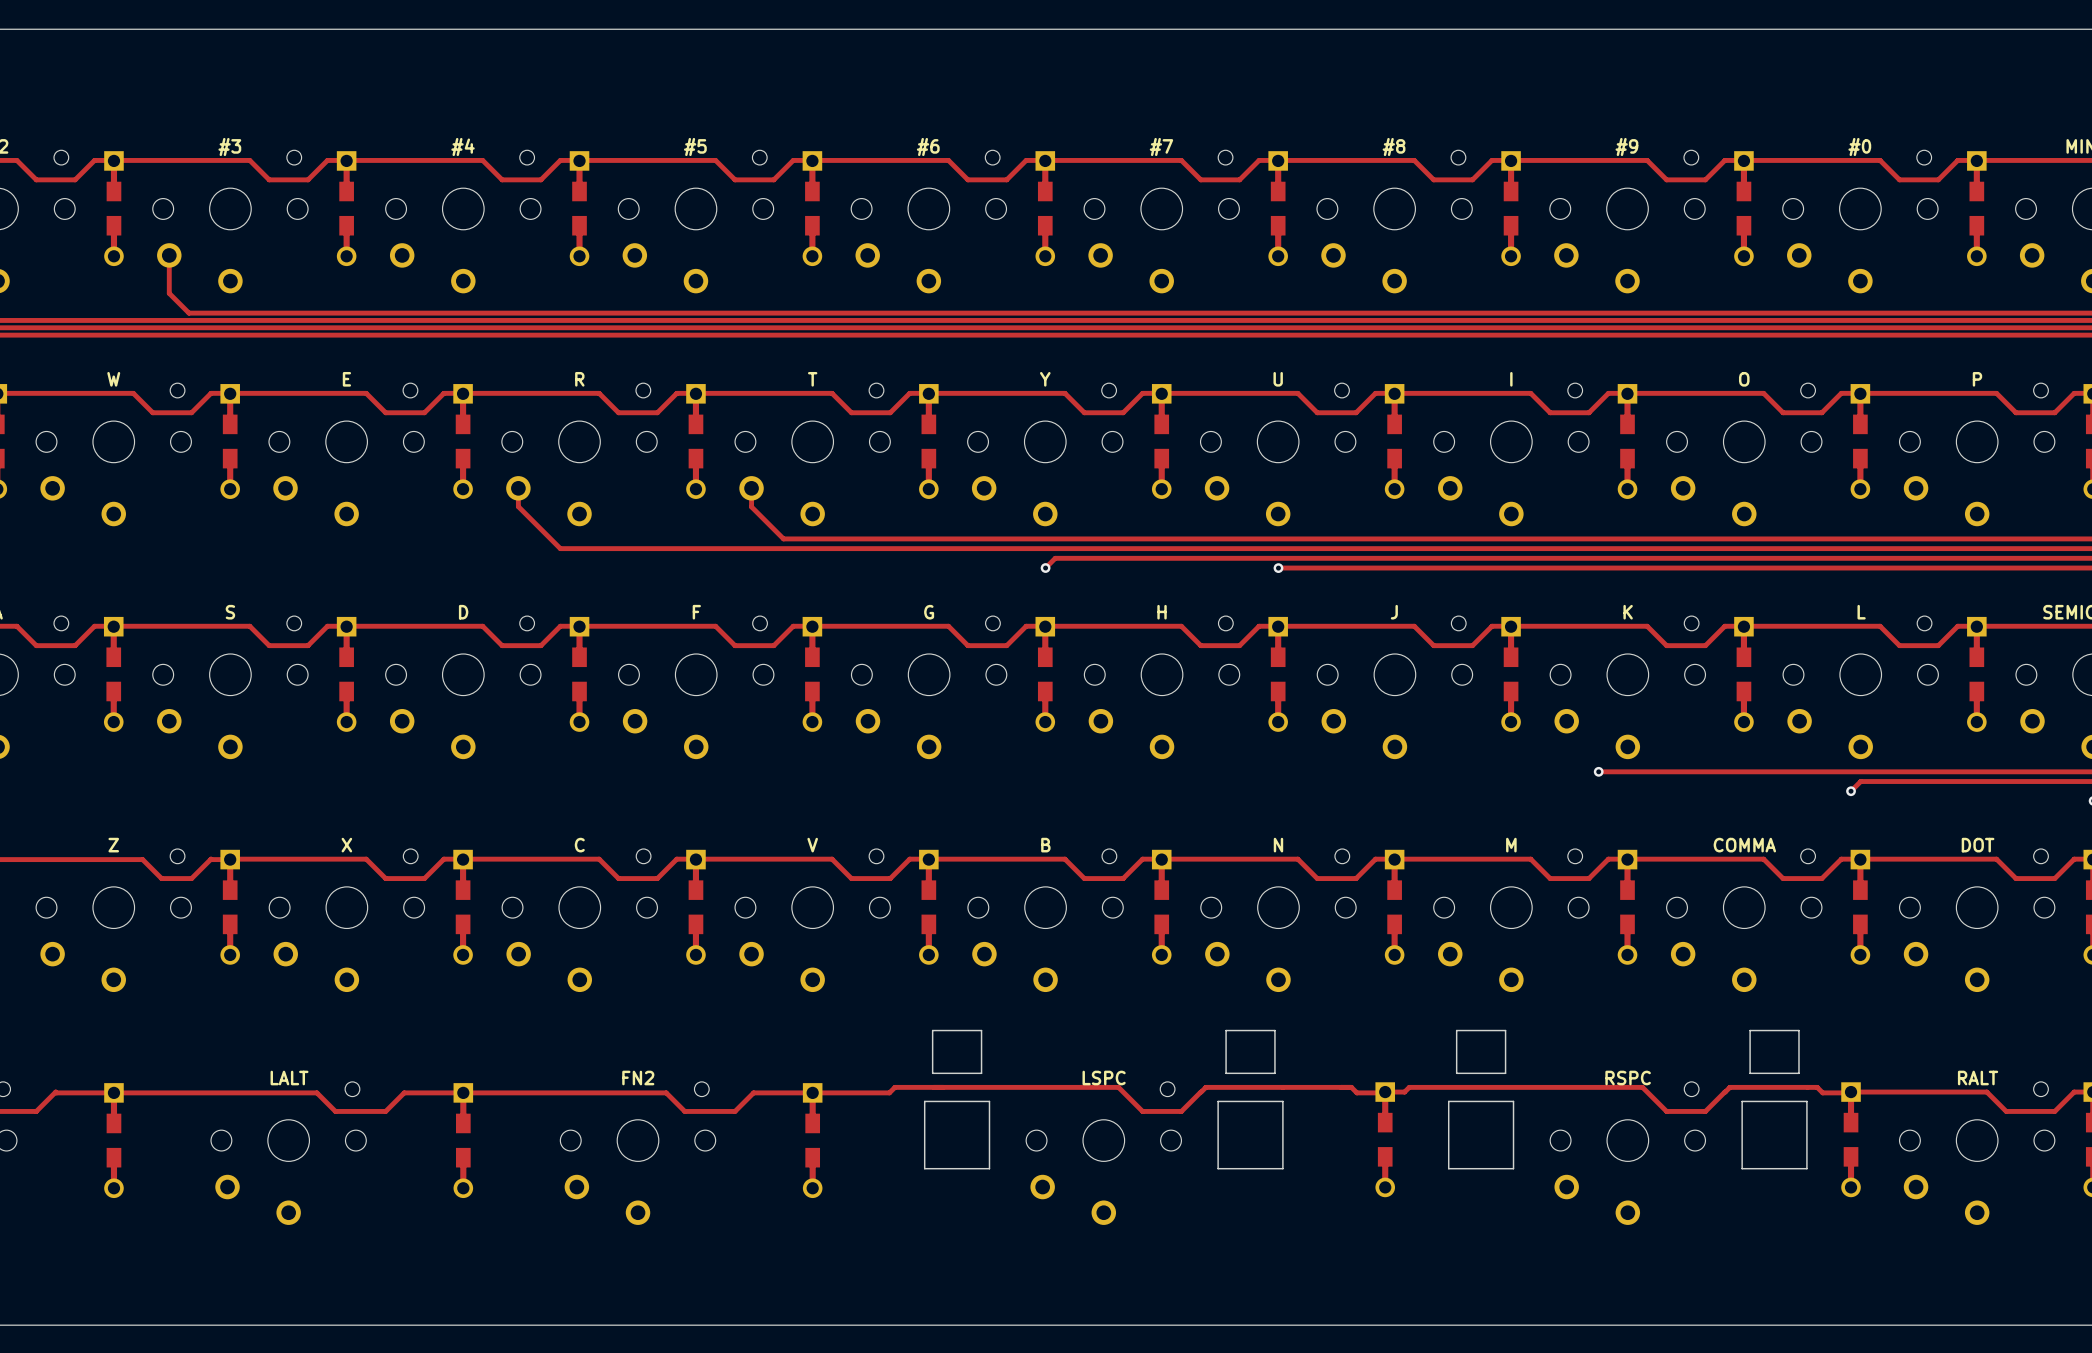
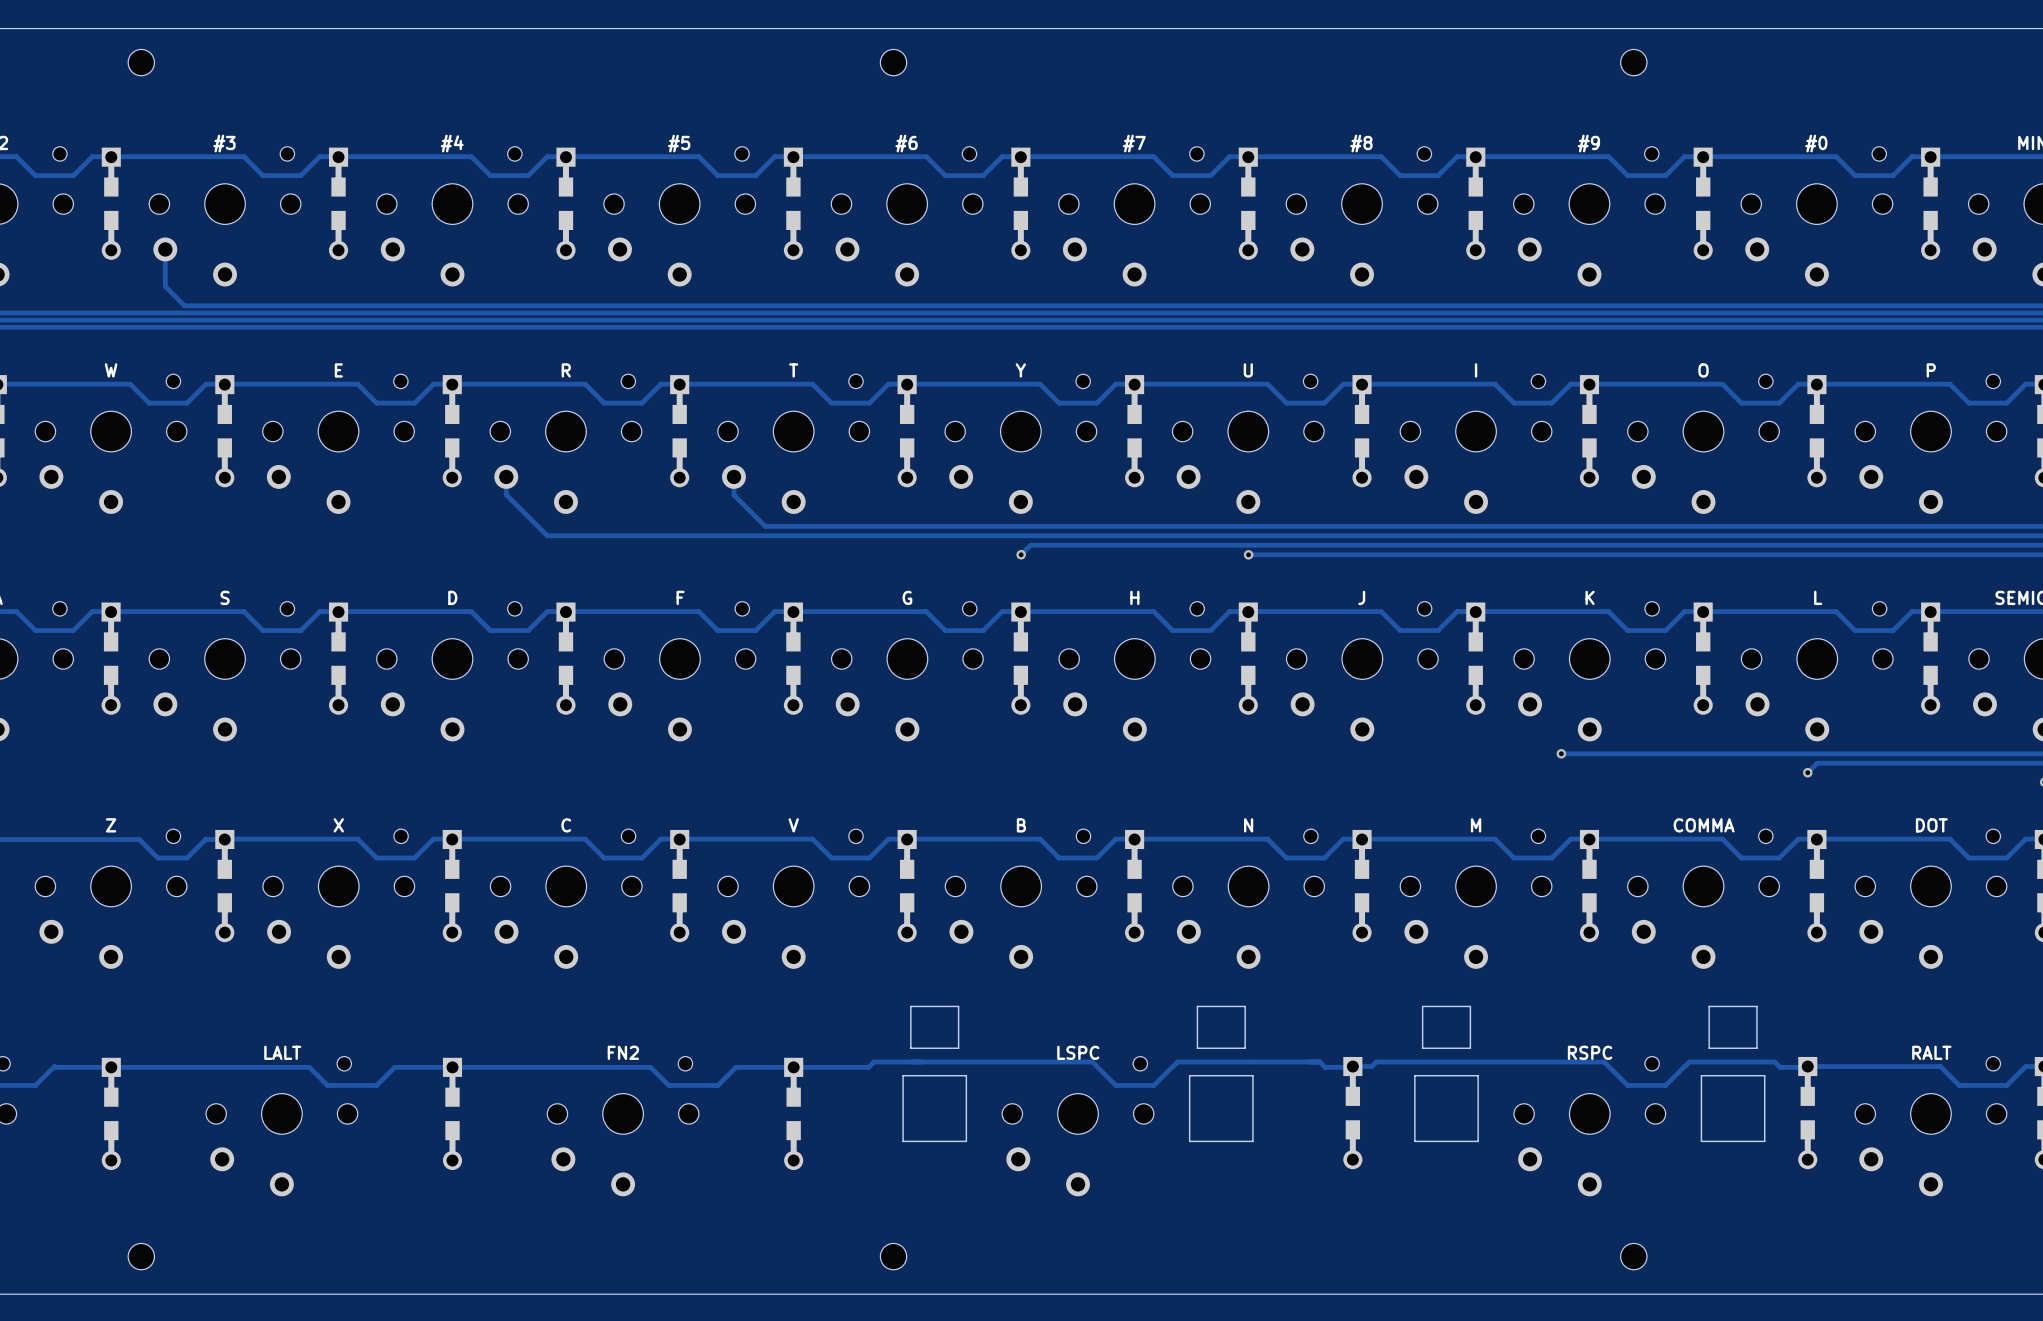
part: none -> (141, 62)
part: none -> (893, 62)
part: none -> (1633, 62)
part: none -> (141, 1256)
part: none -> (893, 1256)
part: none -> (1633, 1256)

